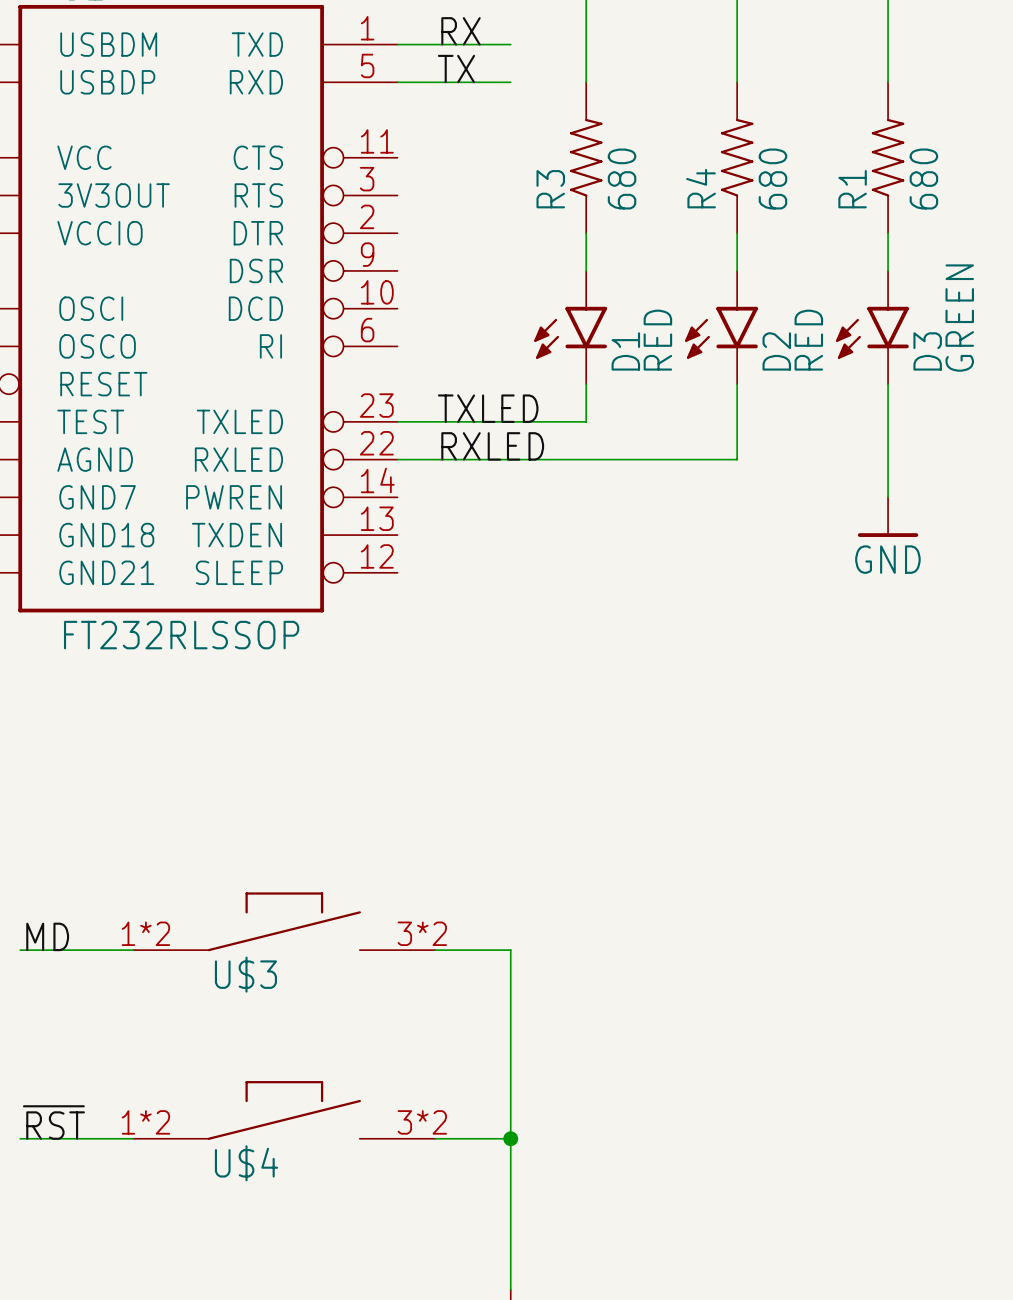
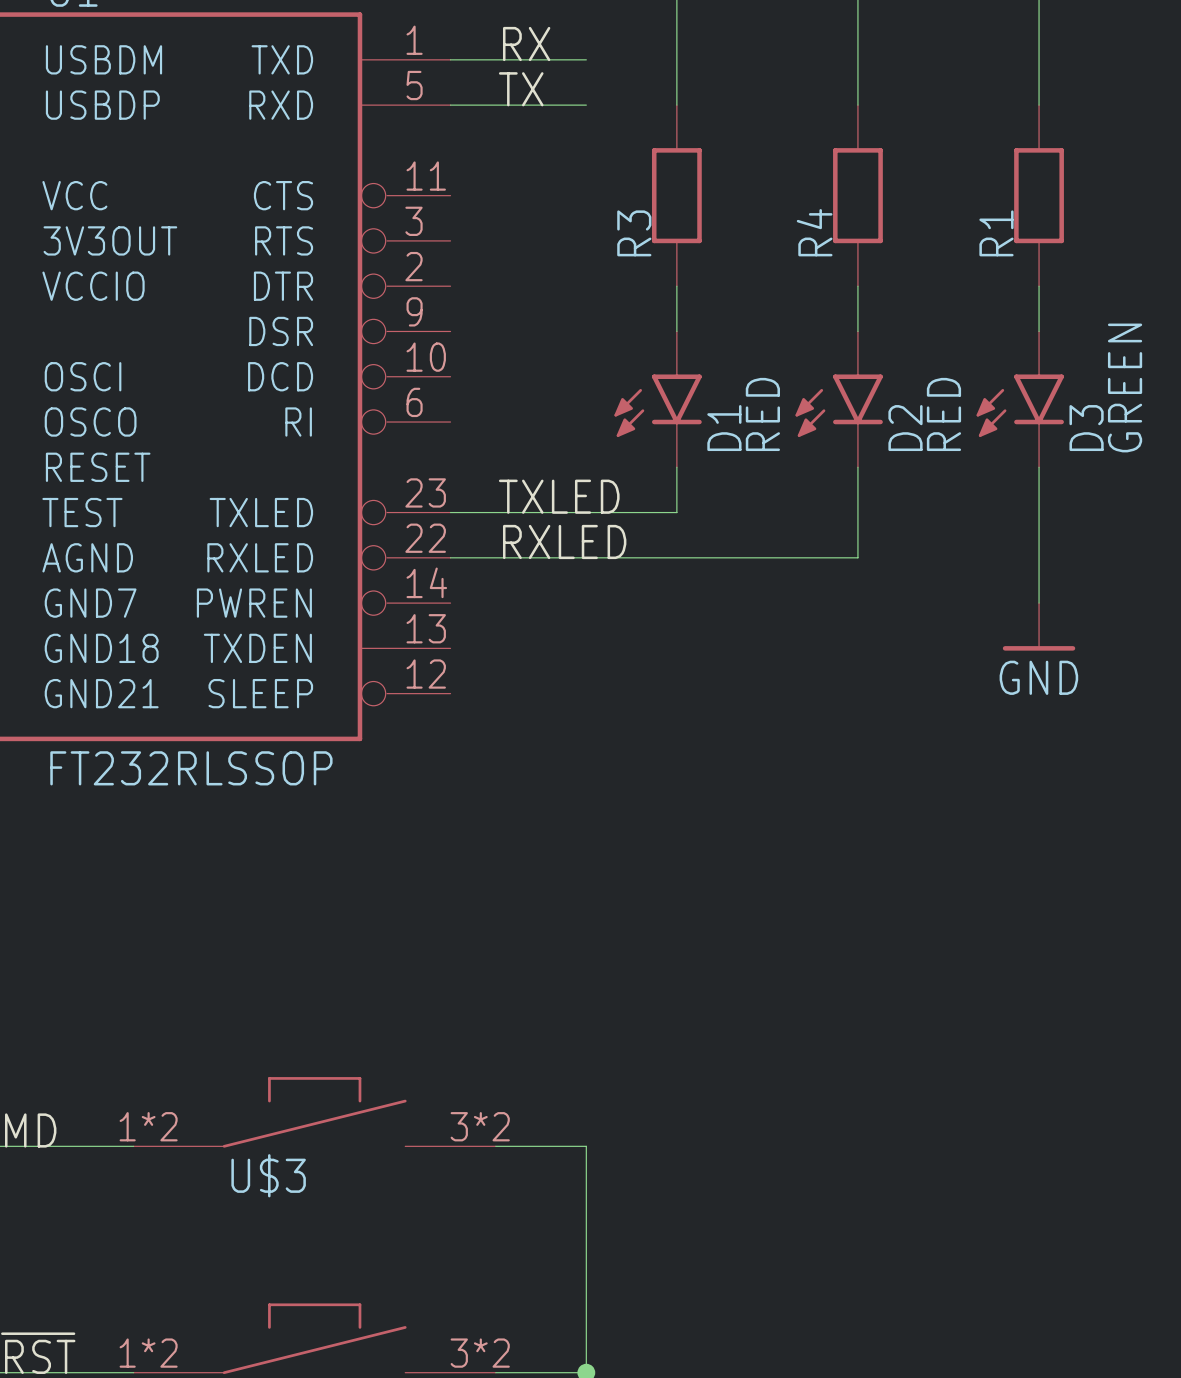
R3 symbol: [569, 82, 603, 234] -> [651, 105, 702, 287]
R4 symbol: [720, 82, 754, 234] -> [833, 105, 883, 287]
R1 symbol: [871, 82, 905, 234] -> [1014, 105, 1064, 287]
R3 value: 680 (622, 179) -> none
R4 value: 680 (772, 179) -> none
R1 value: 680 (923, 179) -> none

